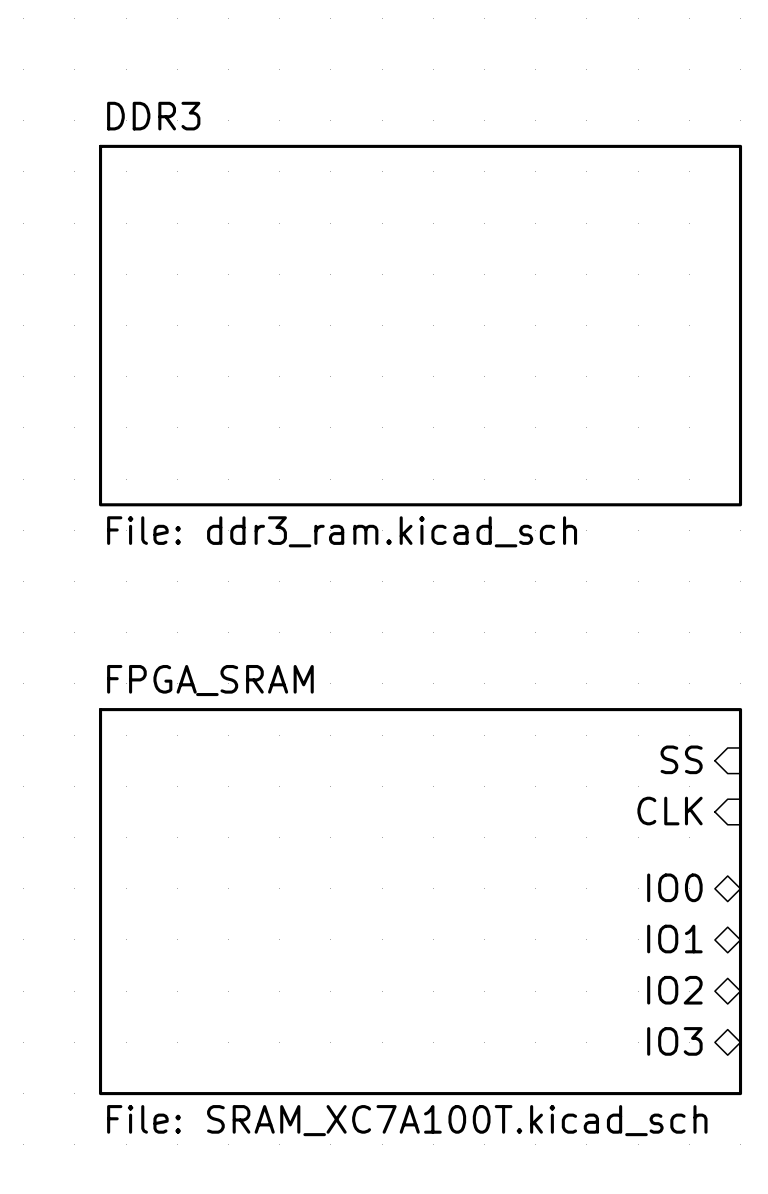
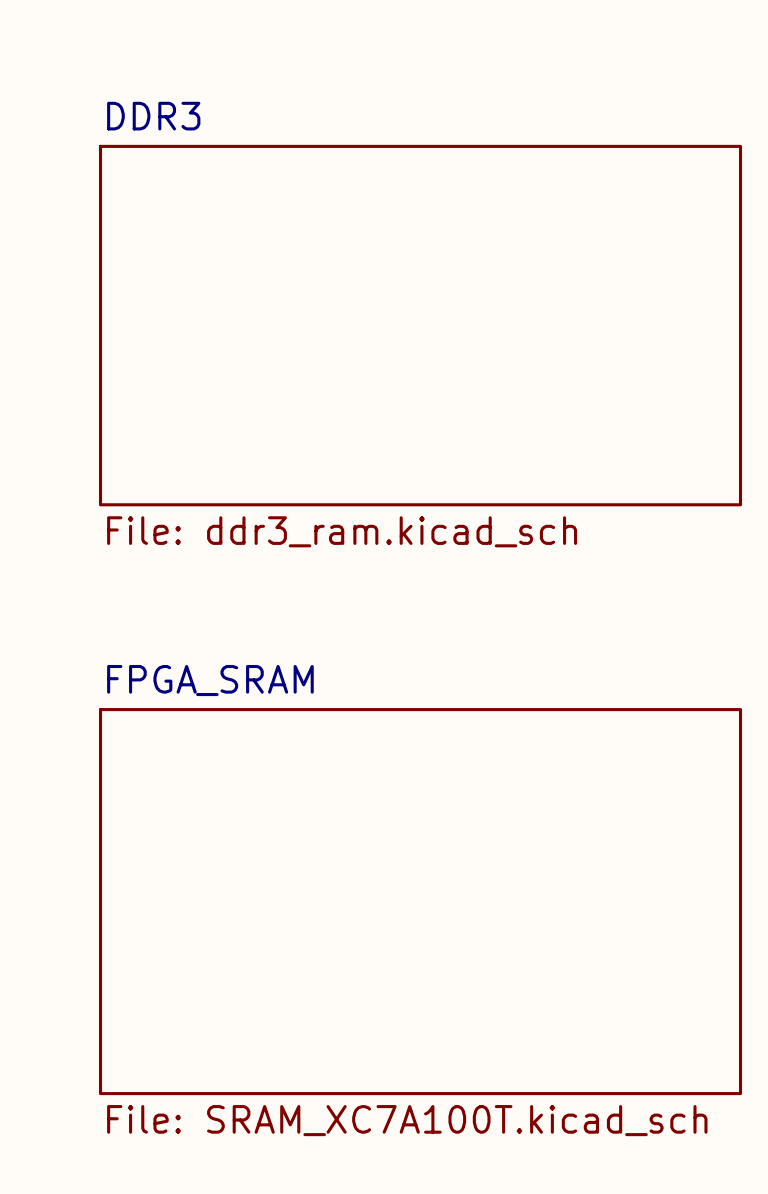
sheet pin: SS (681, 759) -> none
sheet pin: CLK (670, 811) -> none
sheet pin: IO0 (674, 887) -> none
sheet pin: IO1 (674, 939) -> none
sheet pin: IO2 (674, 990) -> none
sheet pin: IO3 (674, 1041) -> none

